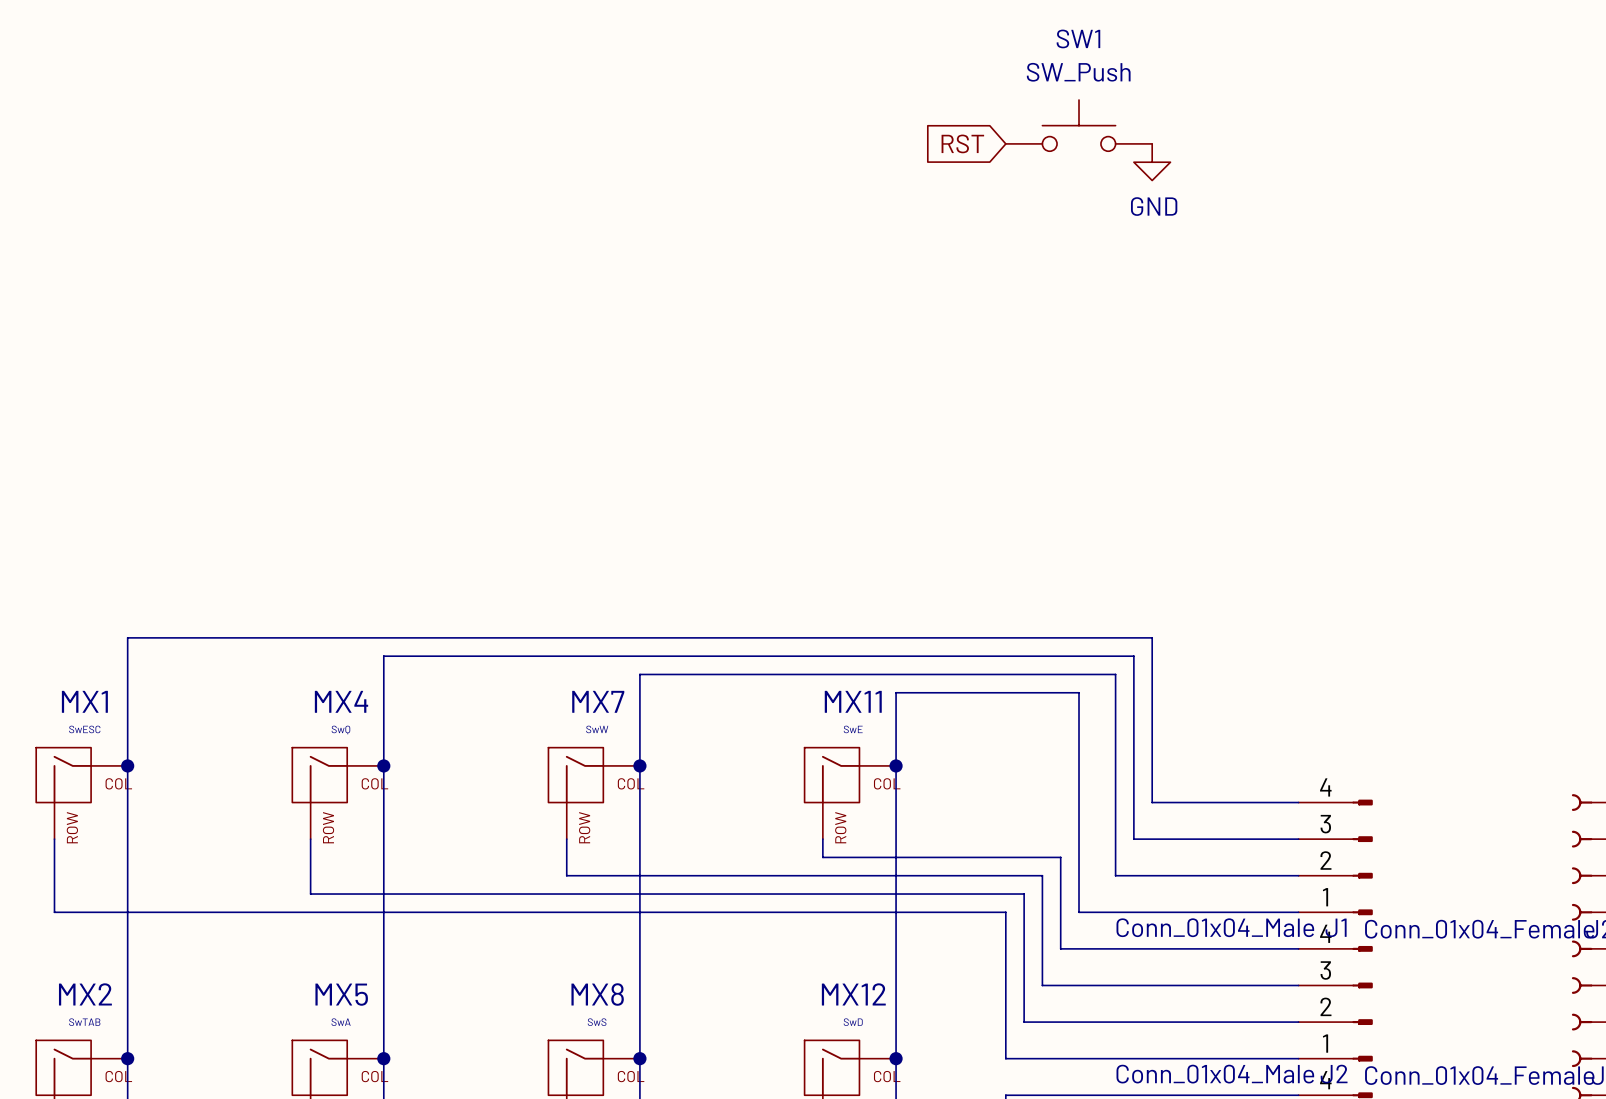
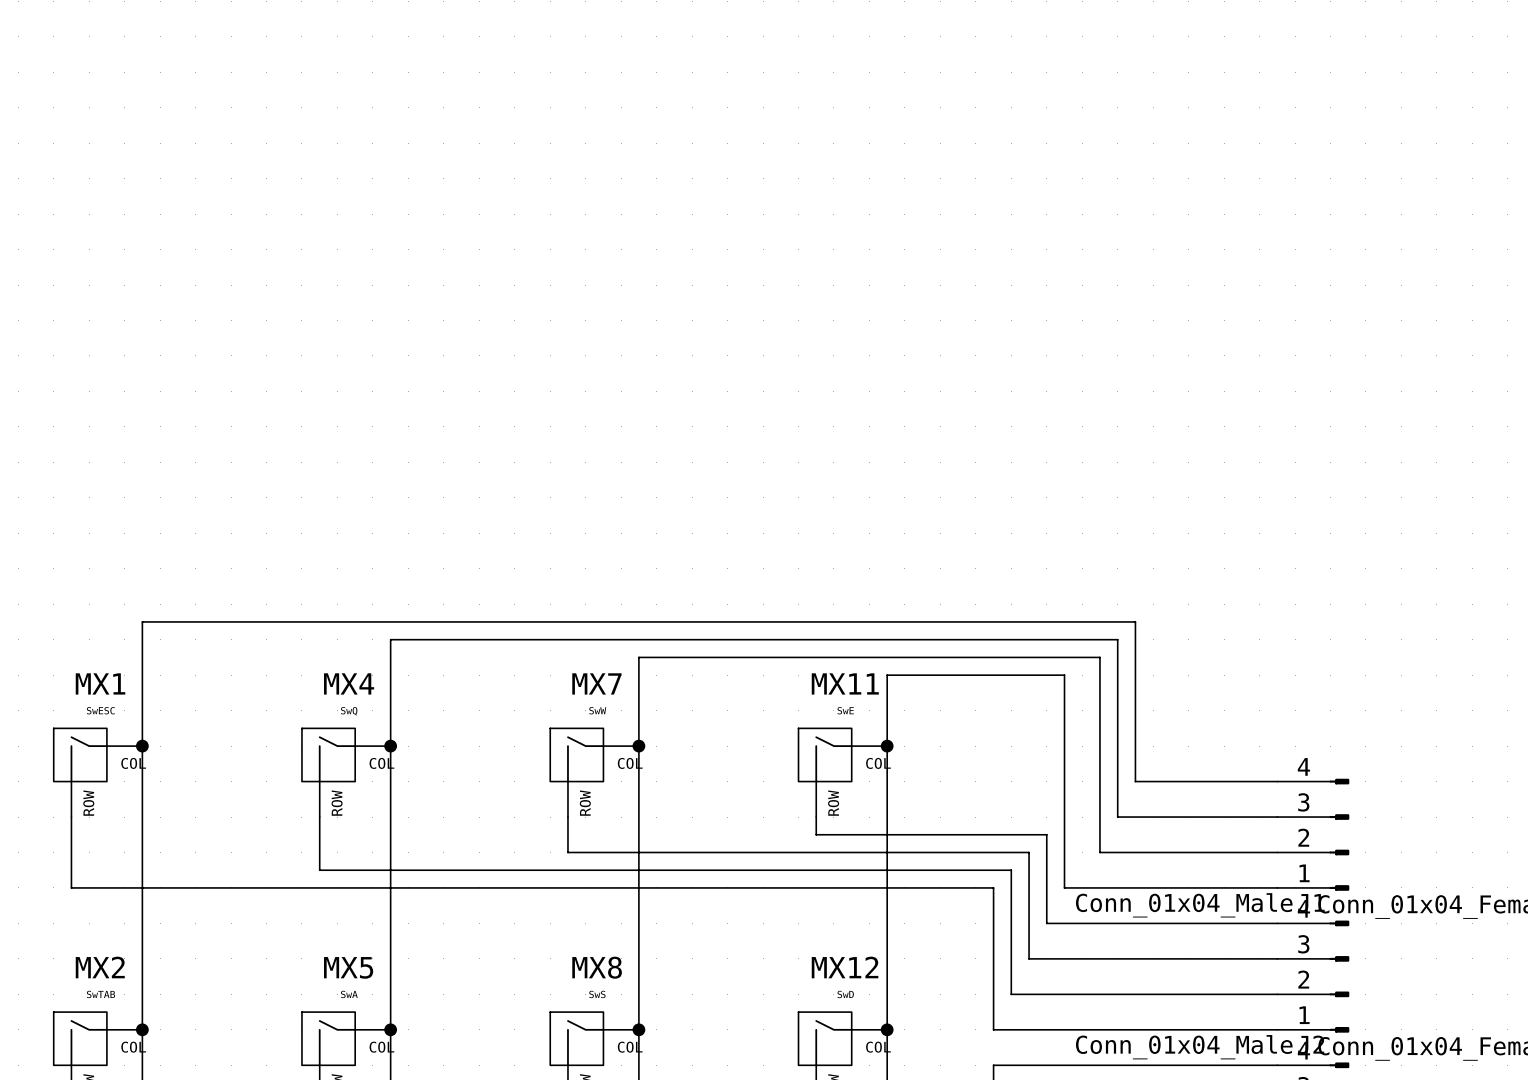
SW1: SW_Push (1079, 125) -> none
global label: RST (962, 143) -> none
power symbol: GND (1152, 162) -> none

